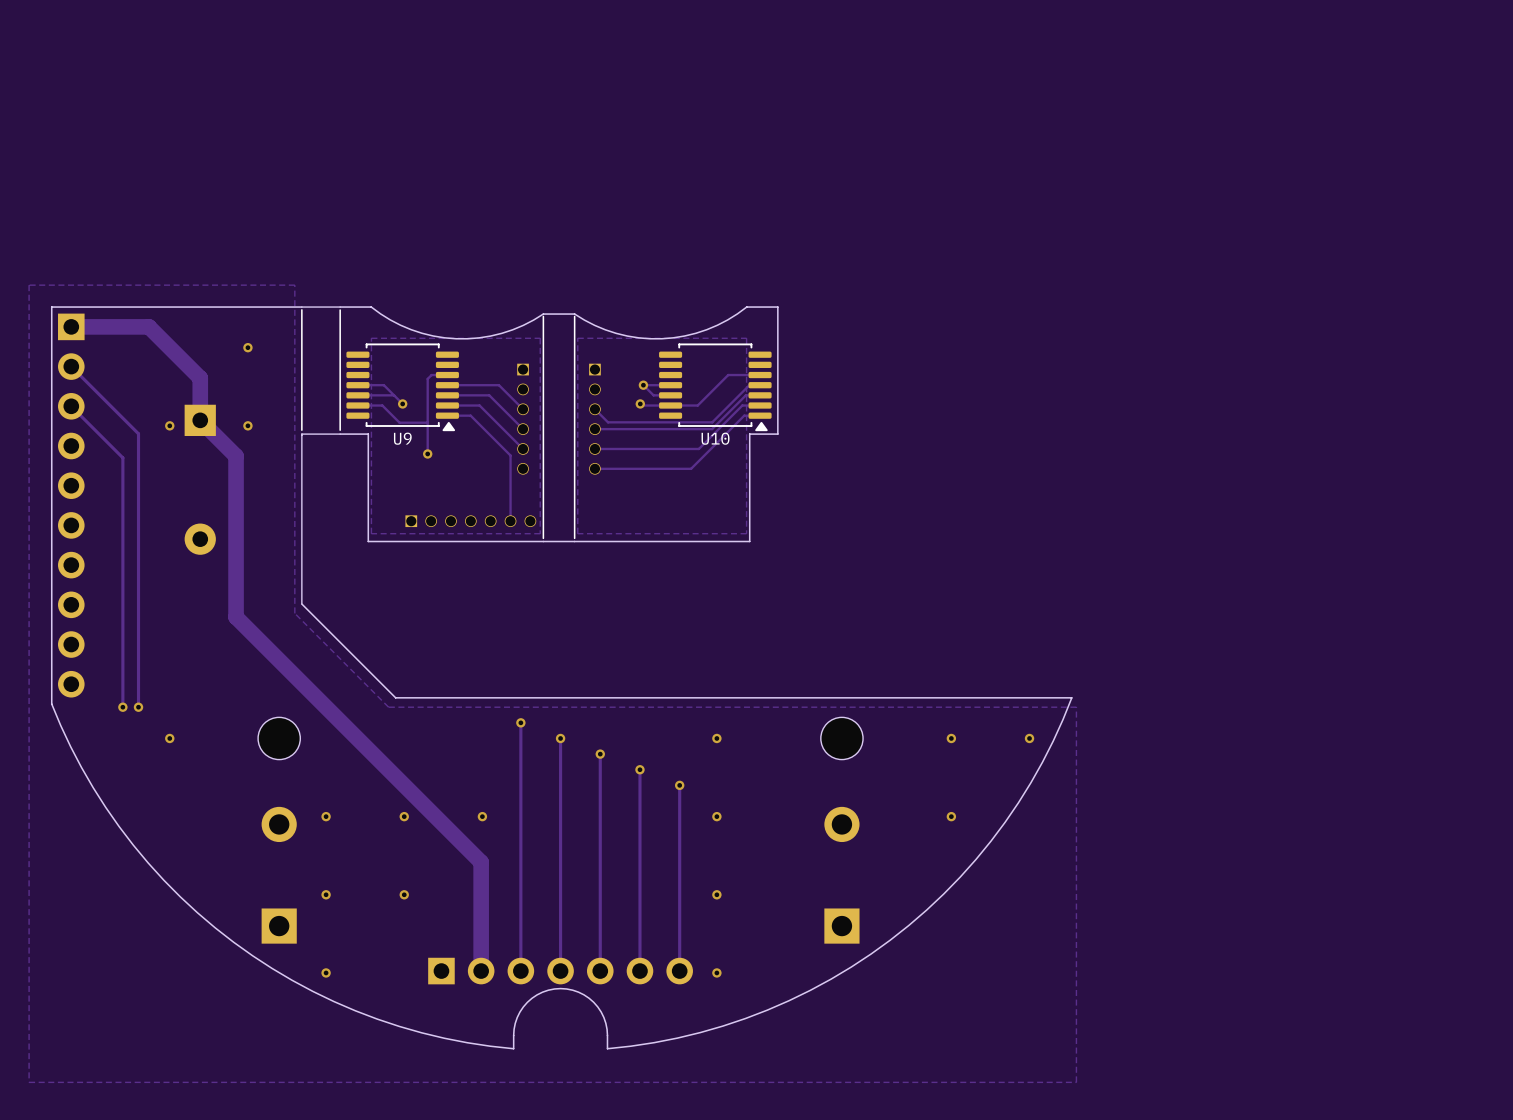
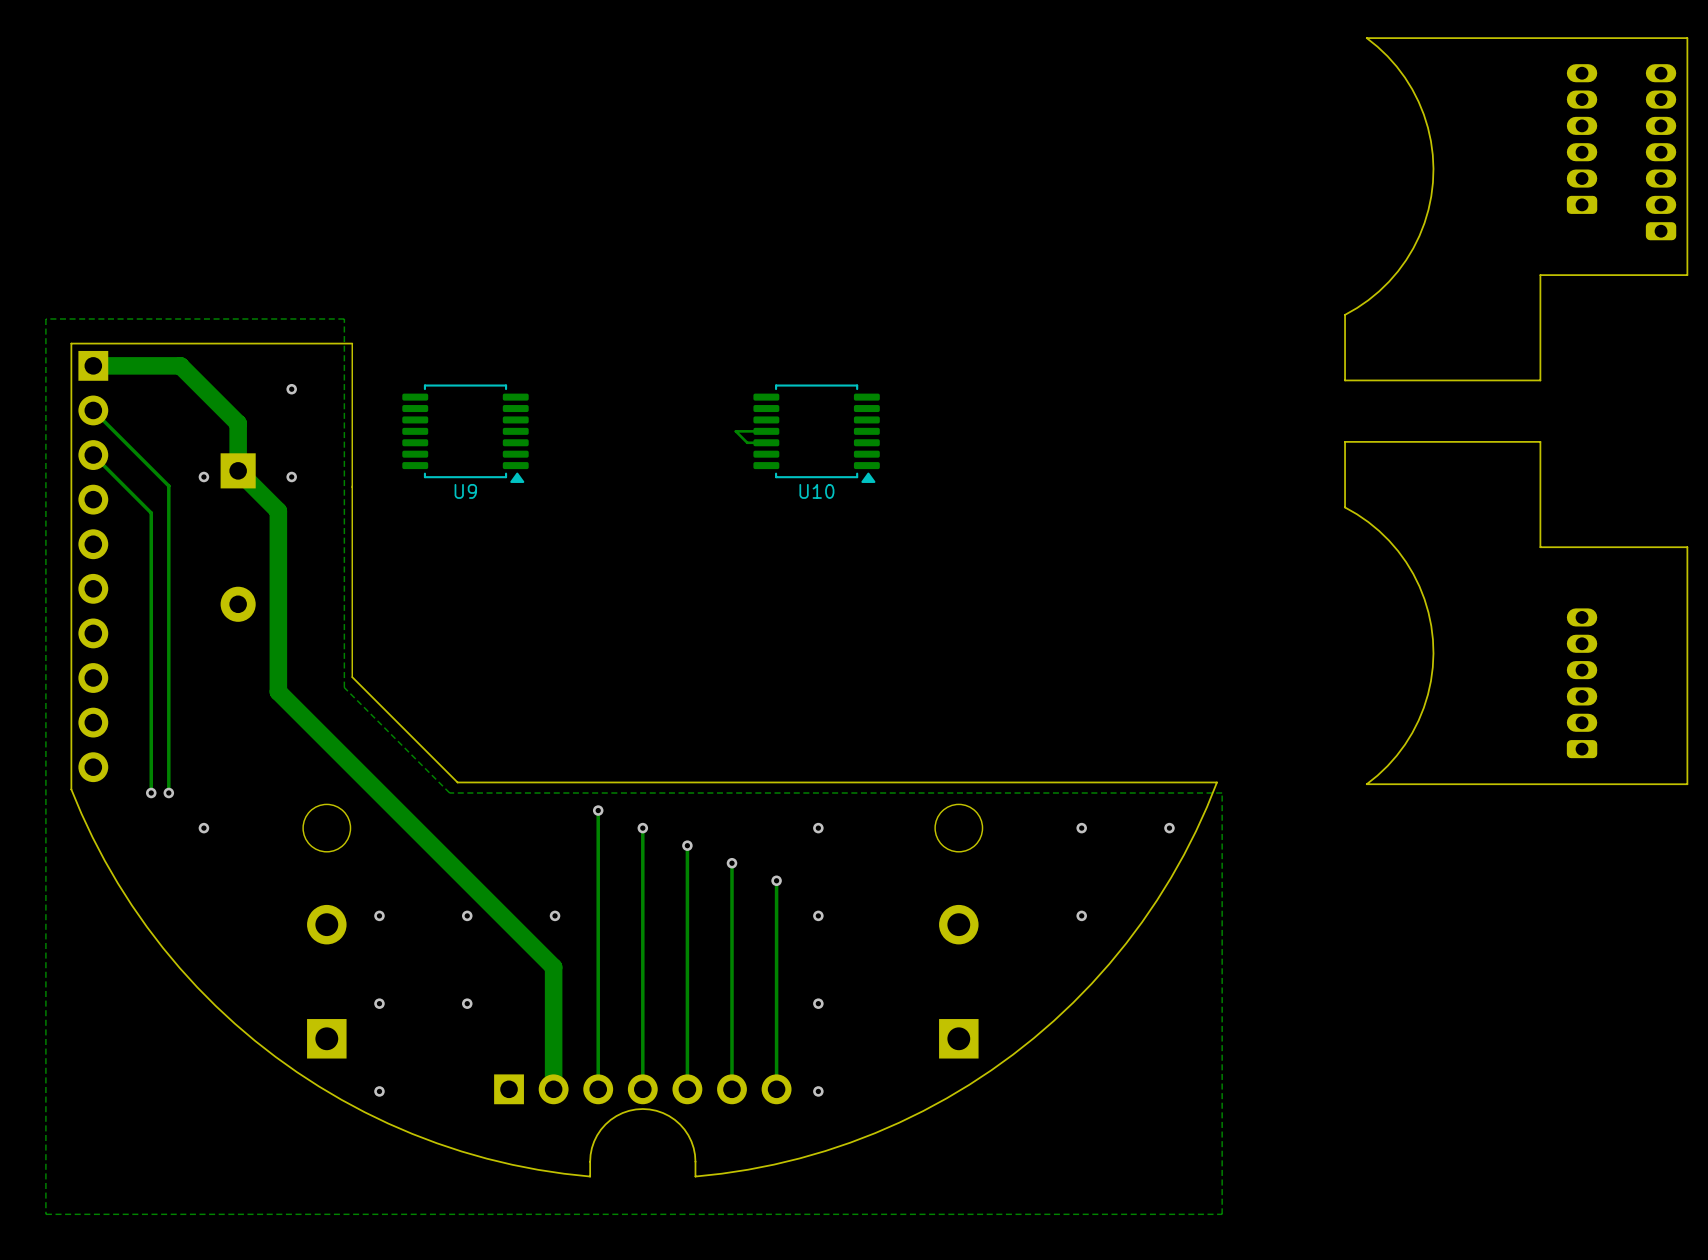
board edge: none -> (1687, 38) (1366, 38) (1396, 66) (1418, 101) (1430, 141) (1432, 182) (1424, 223) (1406, 260) (1379, 291) (1345, 314) (1345, 380) (1540, 380) (1540, 275) (1687, 275) (1687, 38)
part: none -> (1582, 139)
part: none -> (1661, 152)
board edge: (301, 307) (371, 307) (390, 319) (411, 329) (433, 336) (467, 338) (490, 336) (512, 329) (543, 314) (574, 314) (594, 325) (627, 336) (650, 338) (673, 337) (706, 329) (727, 319) (746, 307) (777, 307) (777, 434) (749, 434) (749, 541) (368, 541) (368, 434) (301, 434) -> (352, 343) (352, 486)
line: (301, 309) (301, 430) -> none
line: (340, 310) (340, 430) -> none
line: (543, 316) (543, 538) -> none
line: (574, 316) (574, 538) -> none
zone outline: (540, 338) (371, 338) (371, 533) (540, 533) (540, 338) -> none
zone outline: (746, 338) (577, 338) (577, 533) (746, 533) (746, 338) -> none
track: (447, 375) (431, 375) (427, 378) (427, 453) -> none
track: (760, 375) (728, 375) (697, 405) (641, 405) (640, 403) -> none
track: (357, 385) (383, 385) (402, 403) -> none
track: (447, 385) (498, 385) (523, 409) -> none
via: (643, 385) -> none
track: (760, 385) (749, 385) (712, 422) (608, 422) (594, 409) -> none
board edge: none -> (1540, 441) (1540, 547) (1687, 547) (1687, 784) (1366, 784) (1396, 755) (1418, 720) (1430, 681) (1432, 639) (1424, 599) (1406, 562) (1379, 530) (1345, 507) (1345, 441) (1540, 441)
track: (394, 395) (357, 395) -> none
track: (447, 395) (489, 395) (523, 429) -> none
track: (760, 395) (745, 395) (712, 429) (594, 429) -> none
via: (402, 403) -> none
via: (640, 403) -> none
track: (357, 405) (382, 405) (399, 422) (427, 422) -> none
track: (447, 405) (479, 405) (523, 448) -> none
track: (760, 405) (742, 405) (698, 448) (594, 448) -> none
track: (447, 415) (470, 415) (510, 455) (510, 521) -> none
track: (760, 415) (744, 415) (691, 468) (594, 468) -> none
part: (523, 419) -> none
part: (594, 419) -> none
via: (427, 453) -> none
part: (470, 521) -> none
part: none -> (1582, 683)

